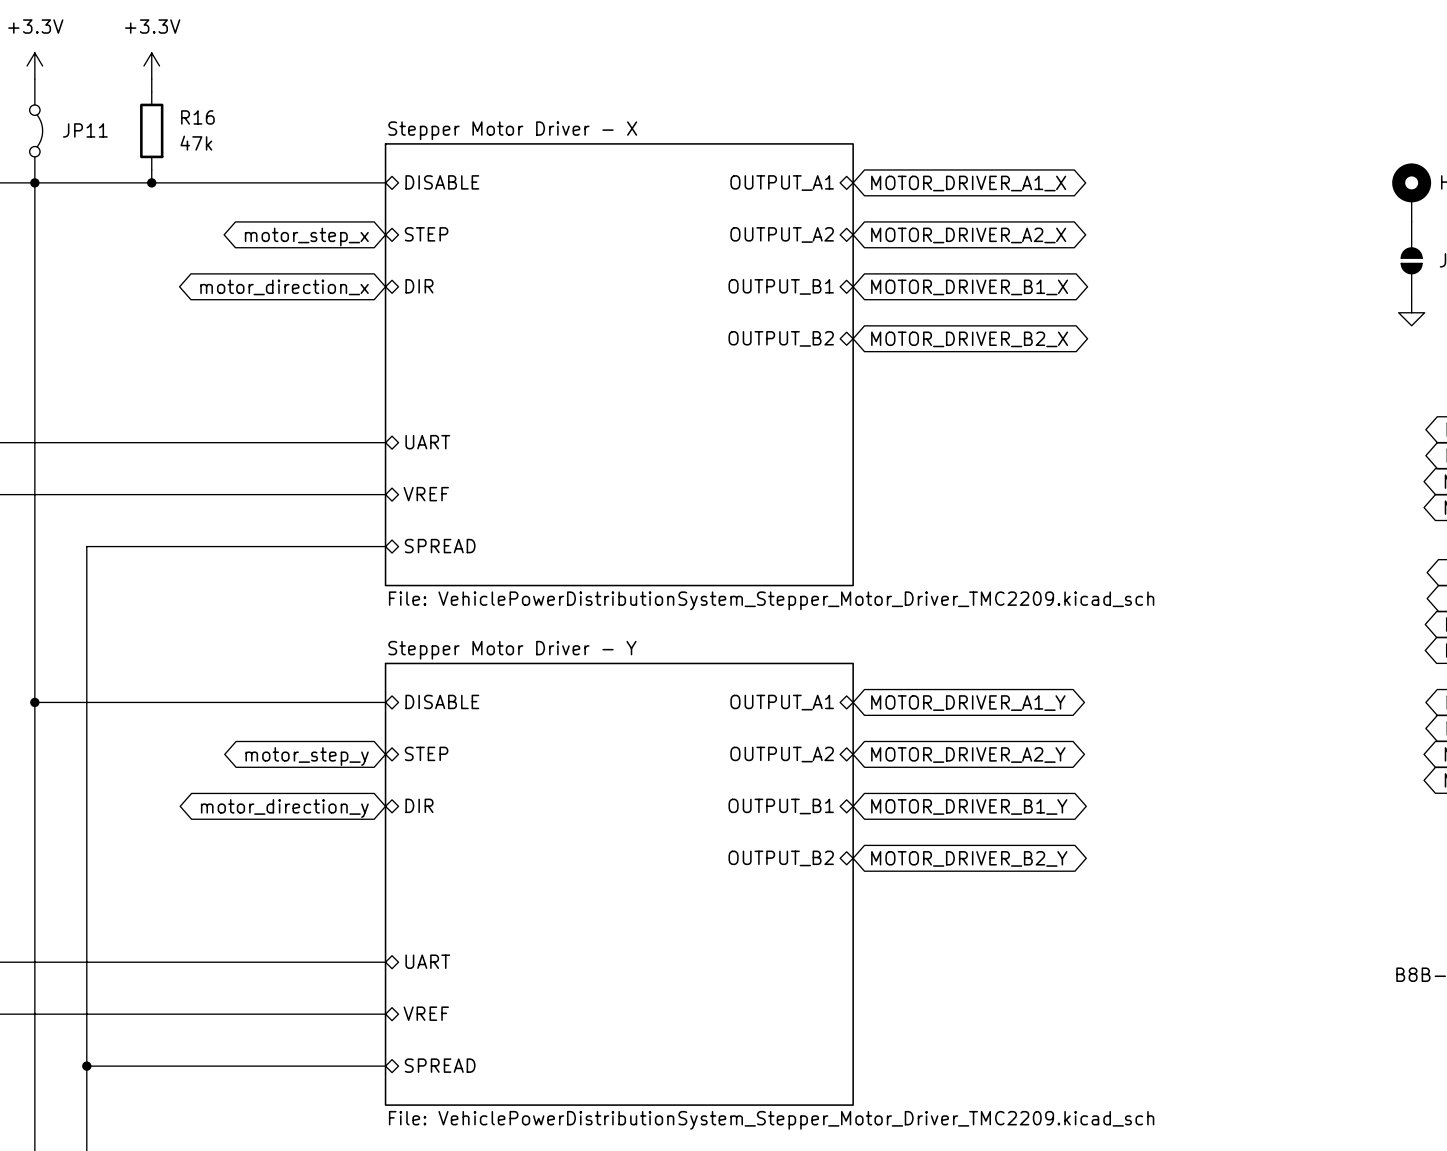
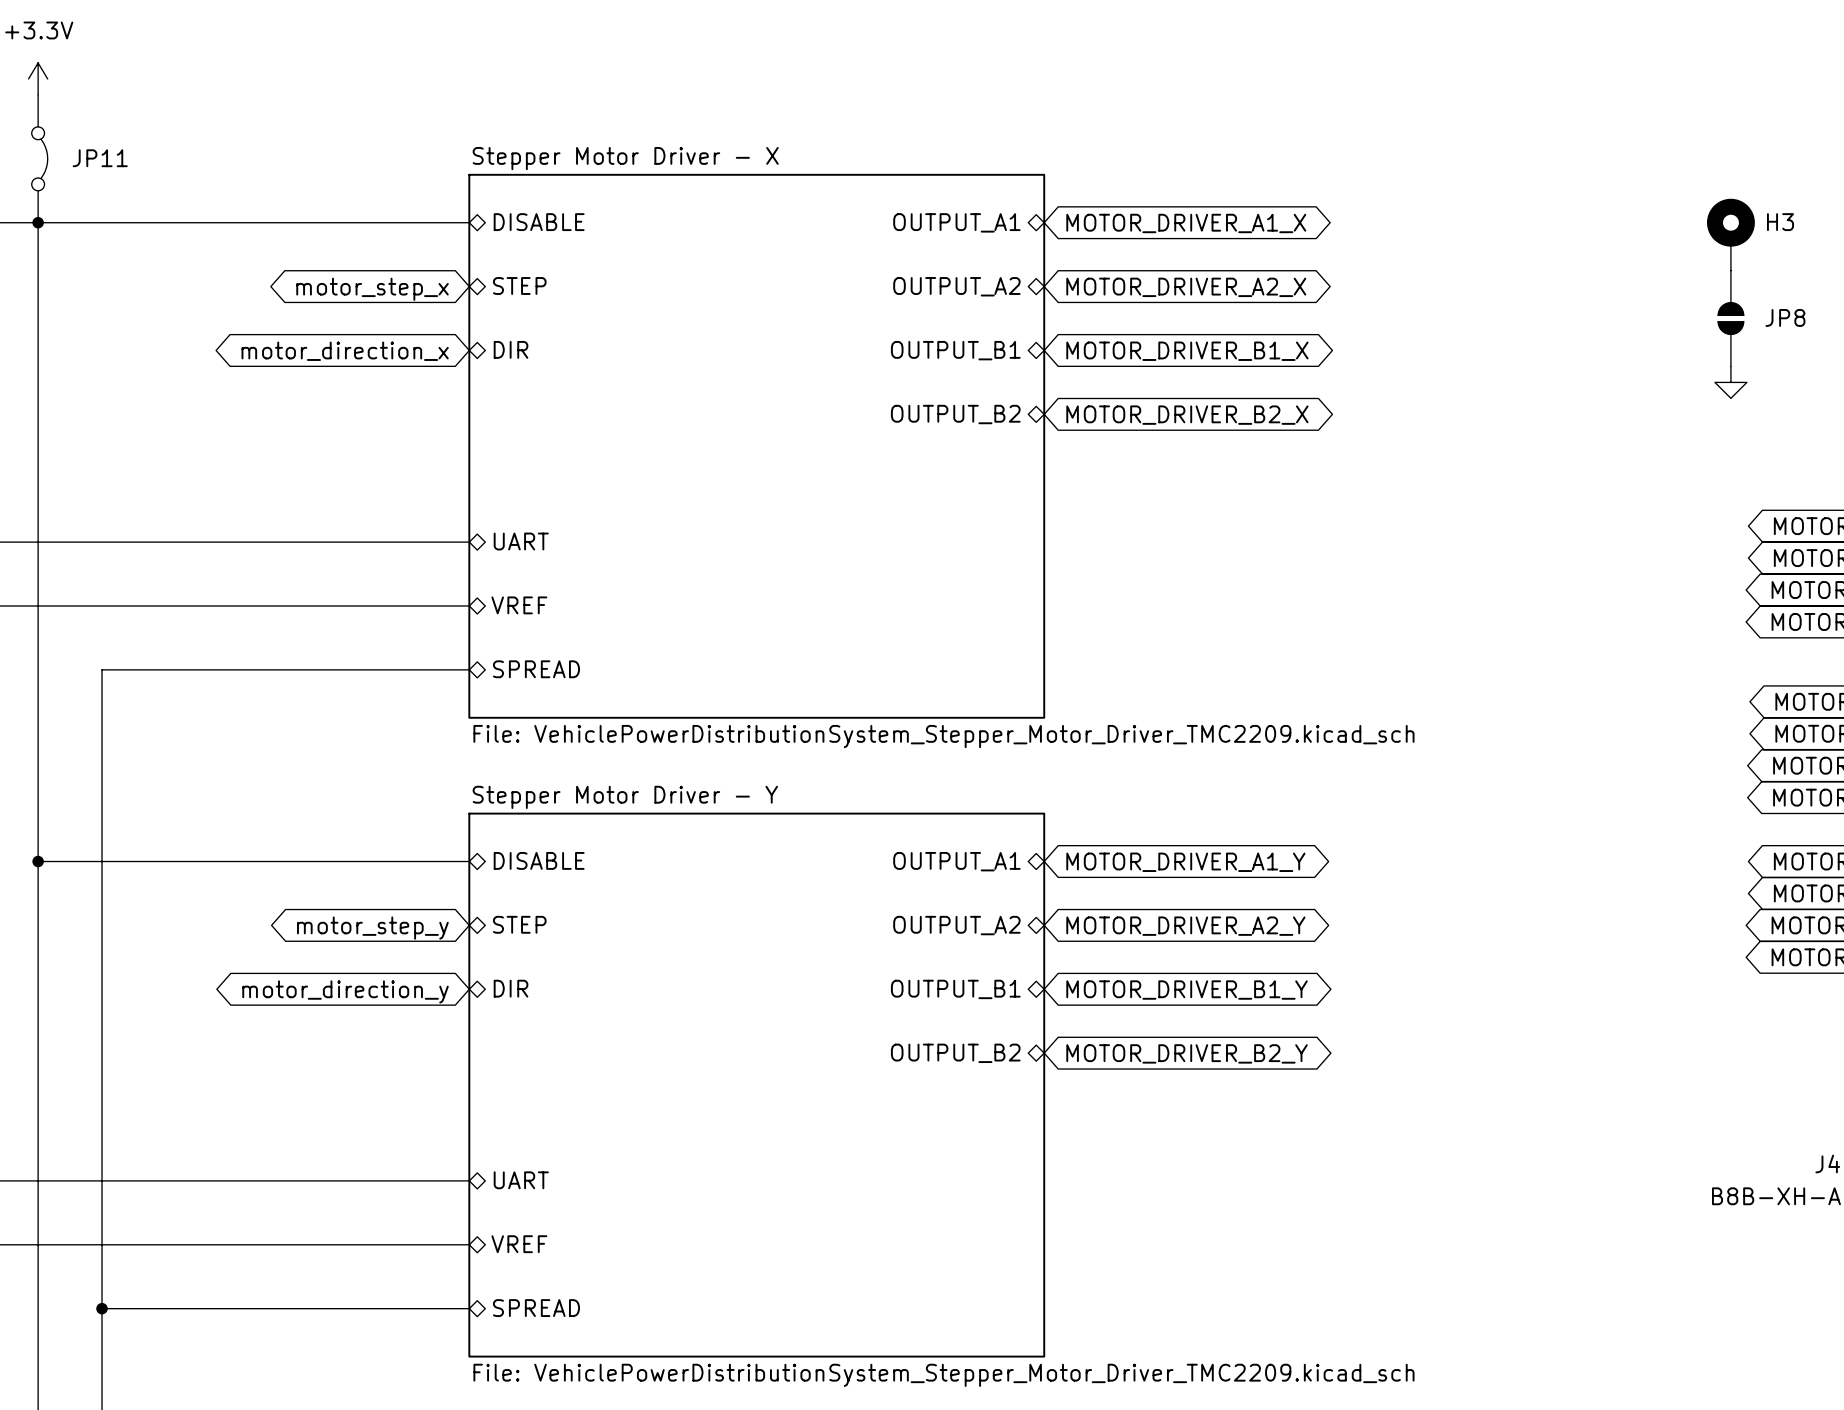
power symbol: +3.3V (151, 65) -> none
wire: (151, 78) (151, 91) -> none
R16: 47k (151, 130) -> none
wire: (151, 169) (151, 182) -> none
junction: (151, 182) -> none

